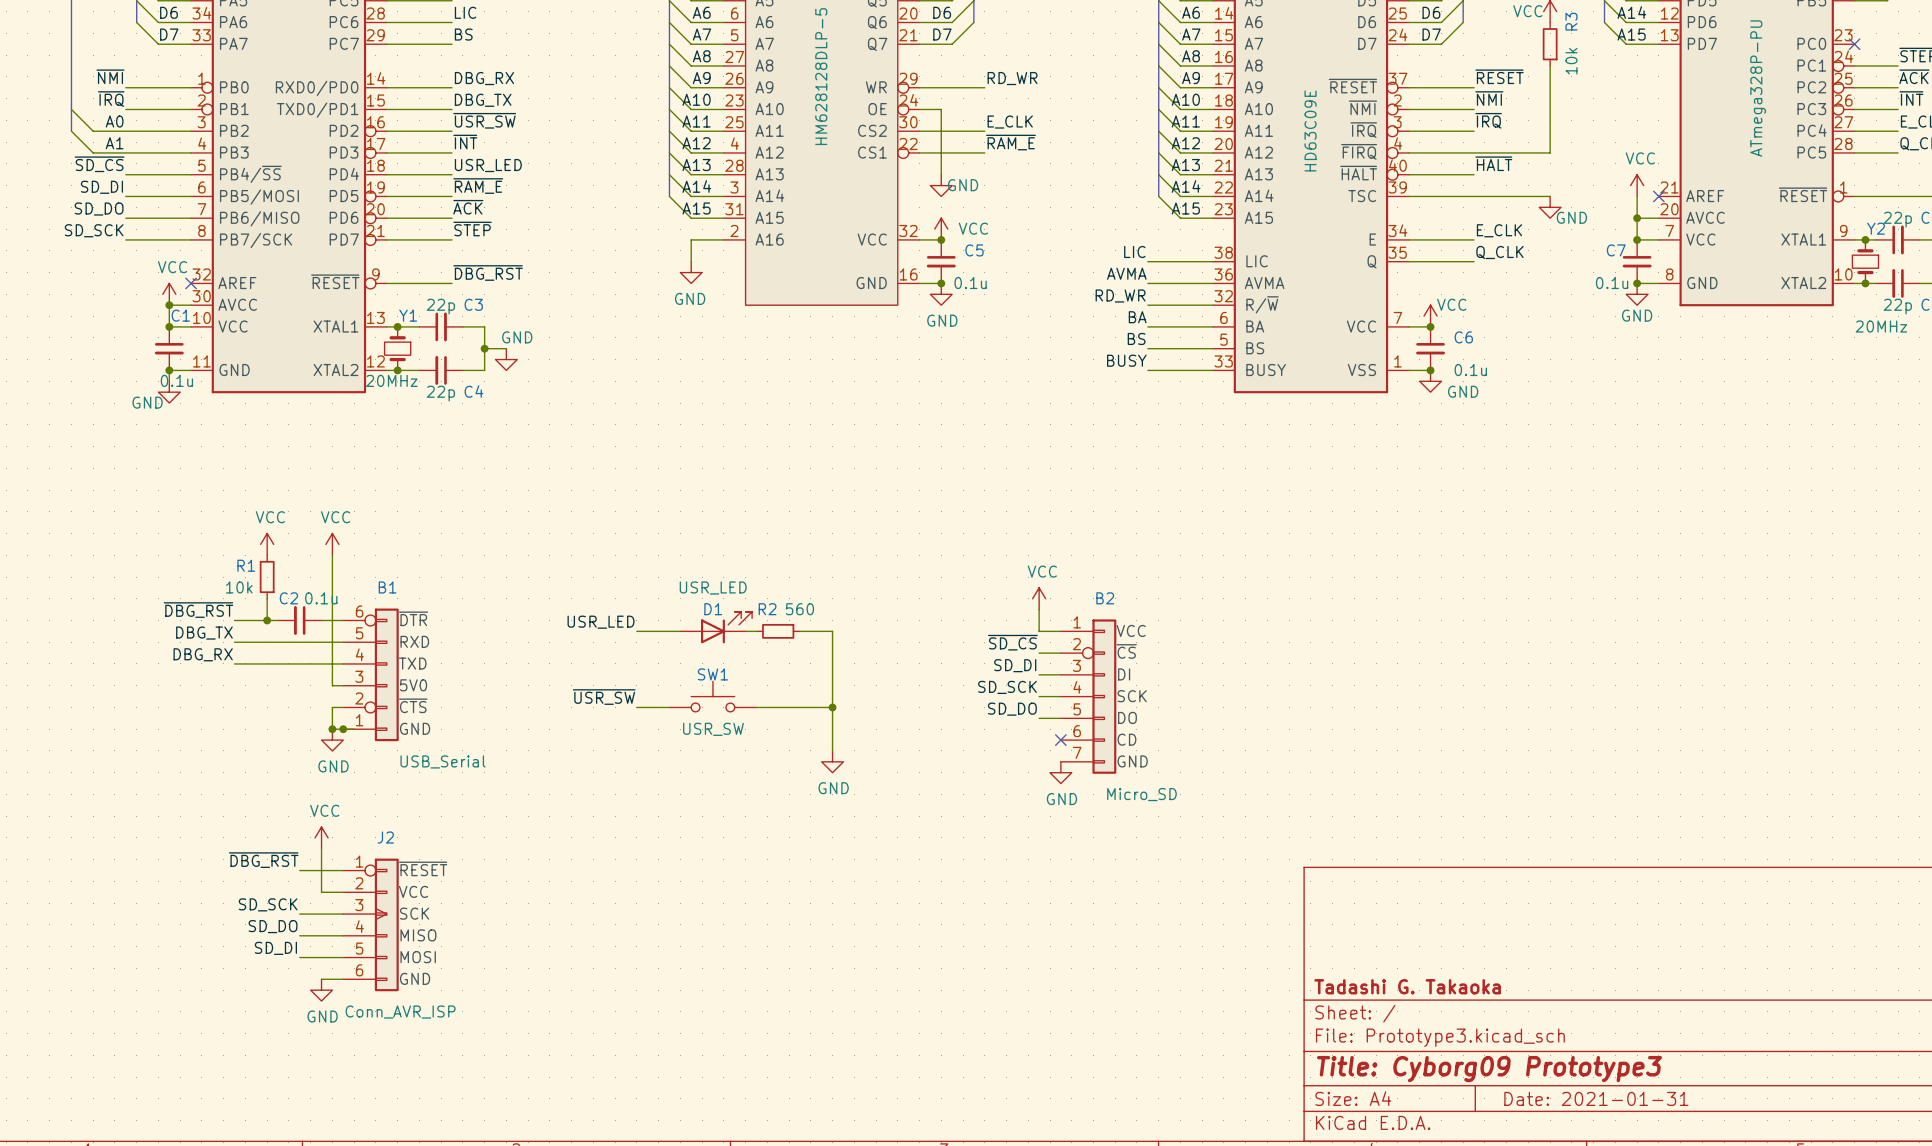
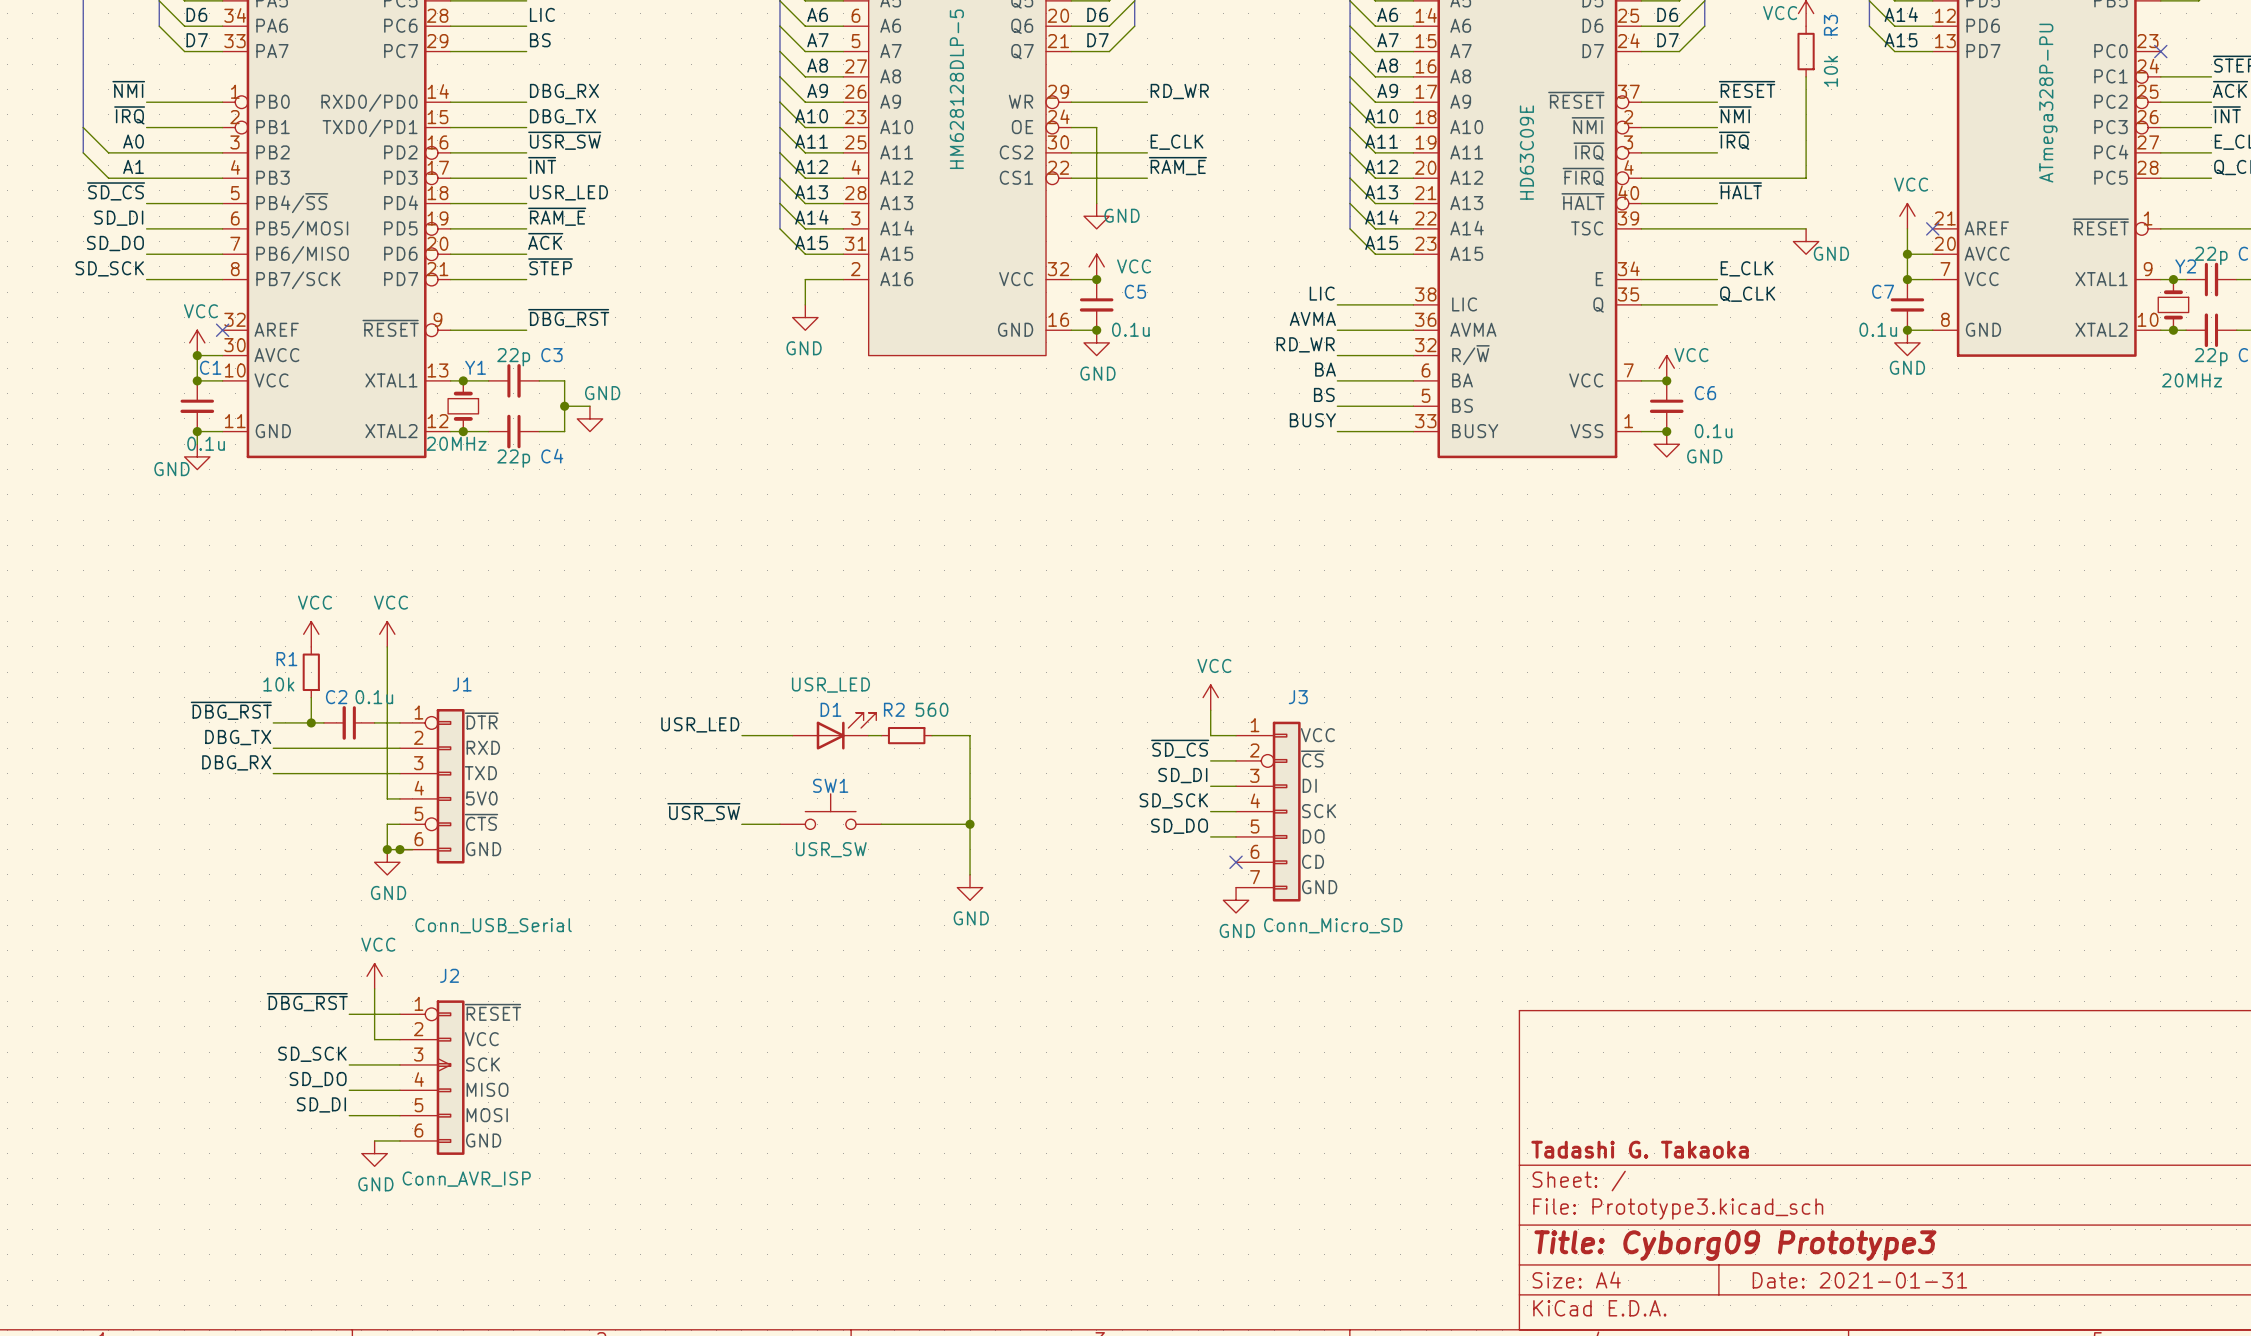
B1 name: B1 (387, 587) -> J1 (462, 684)
B2 name: B2 (1105, 598) -> J3 (1298, 697)
B1 pin number: 6 (359, 611) -> 1 (418, 712)
B1 pin number: 5 (359, 633) -> 2 (418, 737)
B1 pin number: 4 (359, 654) -> 3 (418, 763)
B1 pin number: 3 (359, 676) -> 4 (419, 788)
B1 pin number: 2 (359, 698) -> 5 (418, 813)
B1 pin number: 1 (359, 720) -> 6 (418, 839)
B1 value: USB_Serial (443, 761) -> Conn_USB_Serial (493, 925)
B2 value: Micro_SD (1141, 794) -> Conn_Micro_SD (1333, 925)

